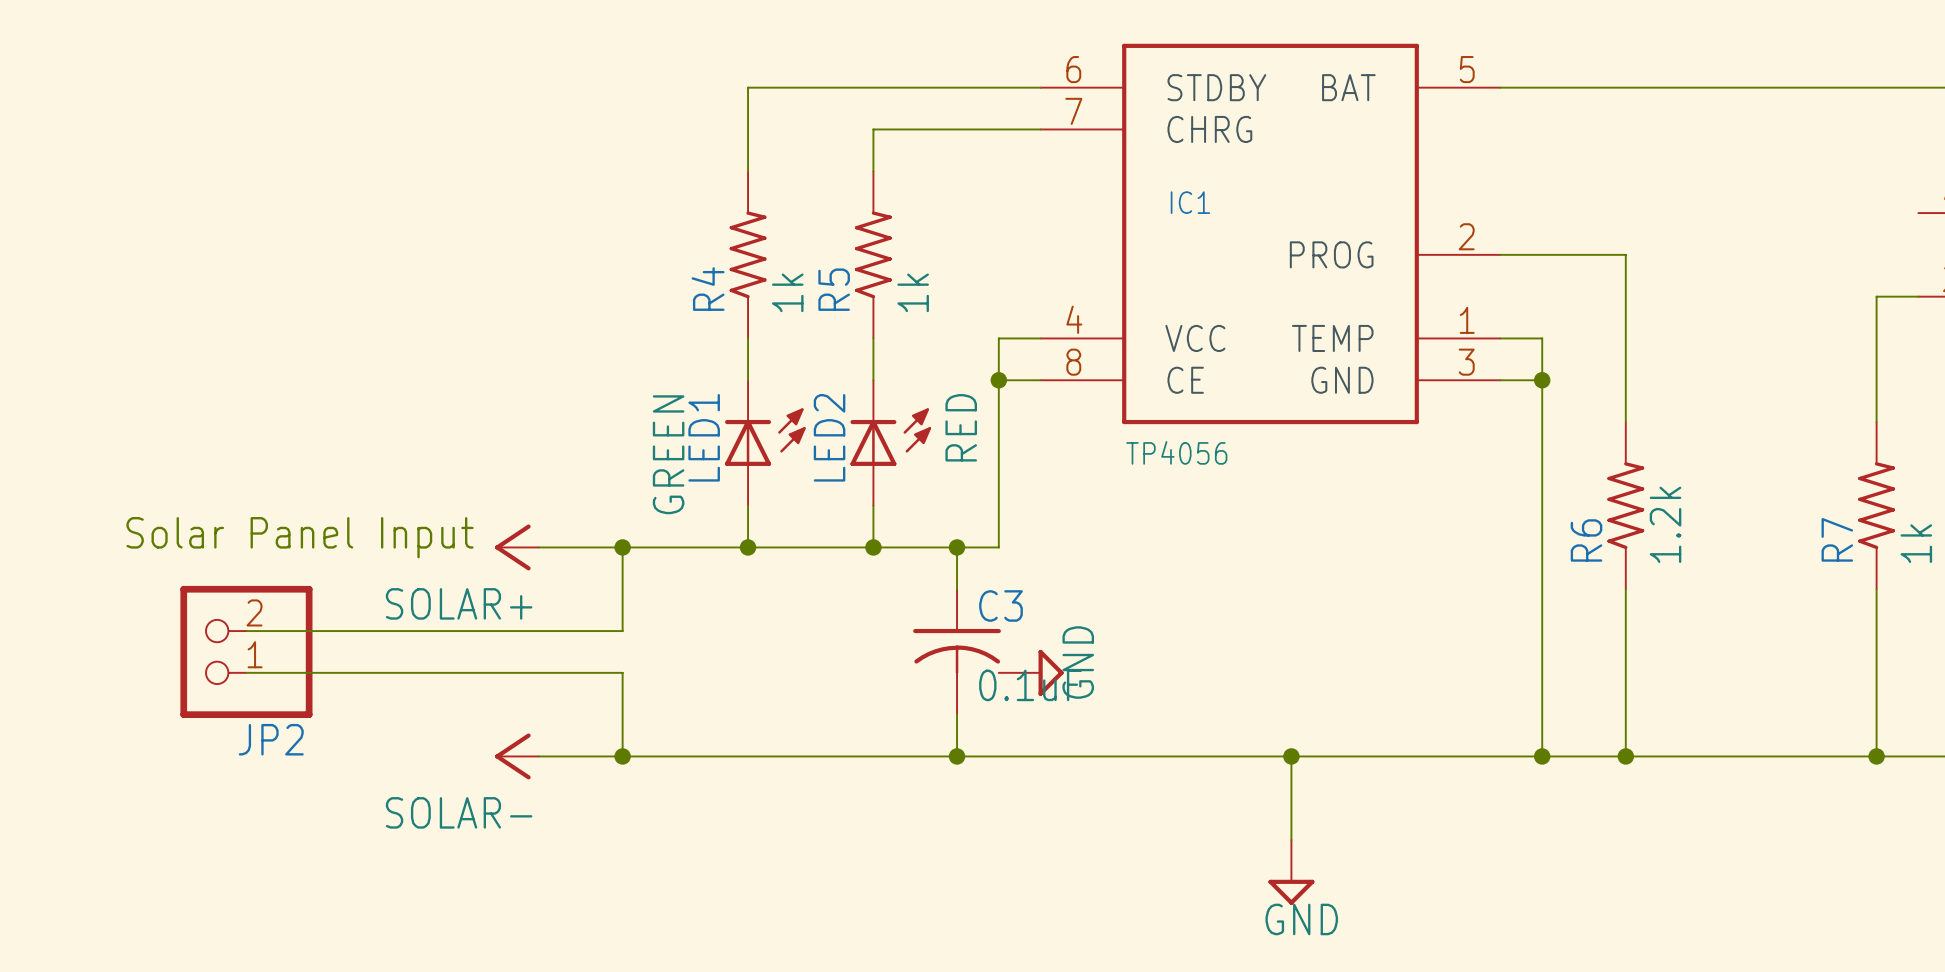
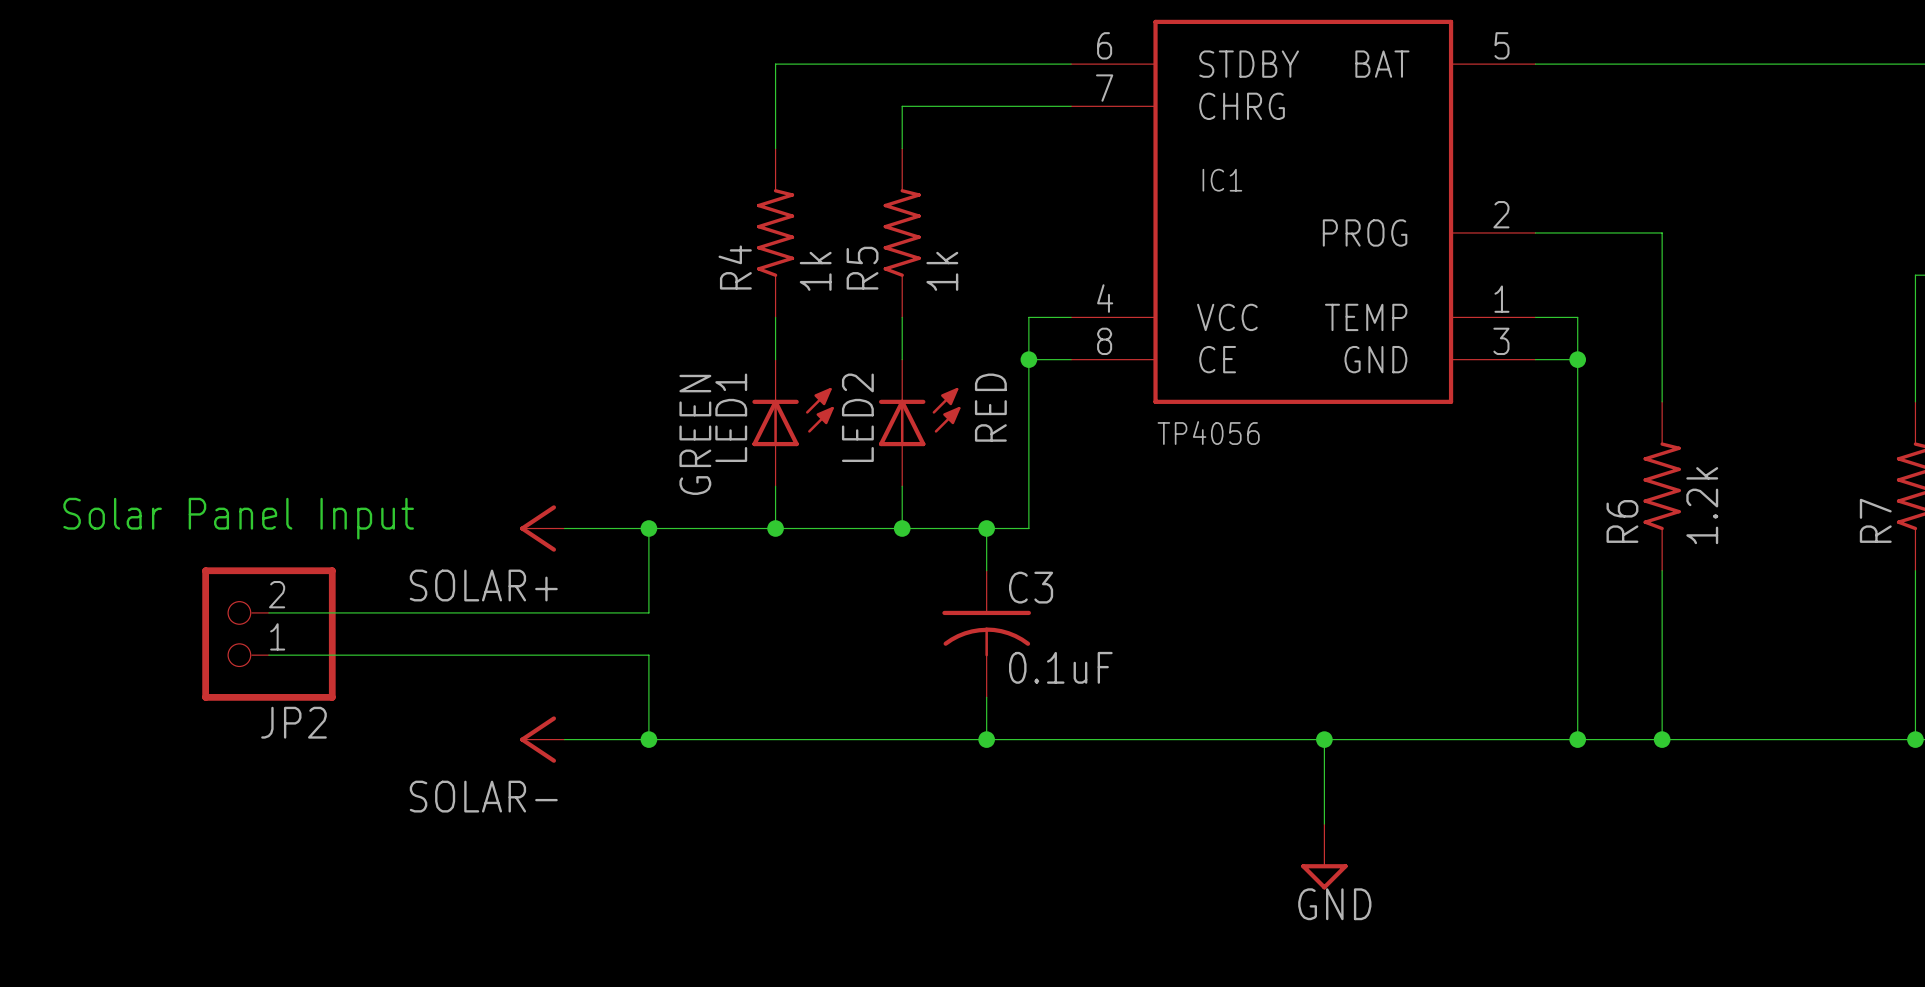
text position: Solar Panel Input (300, 537) -> Solar Panel Input (238, 518)
power symbol: GND (1031, 672) -> none

